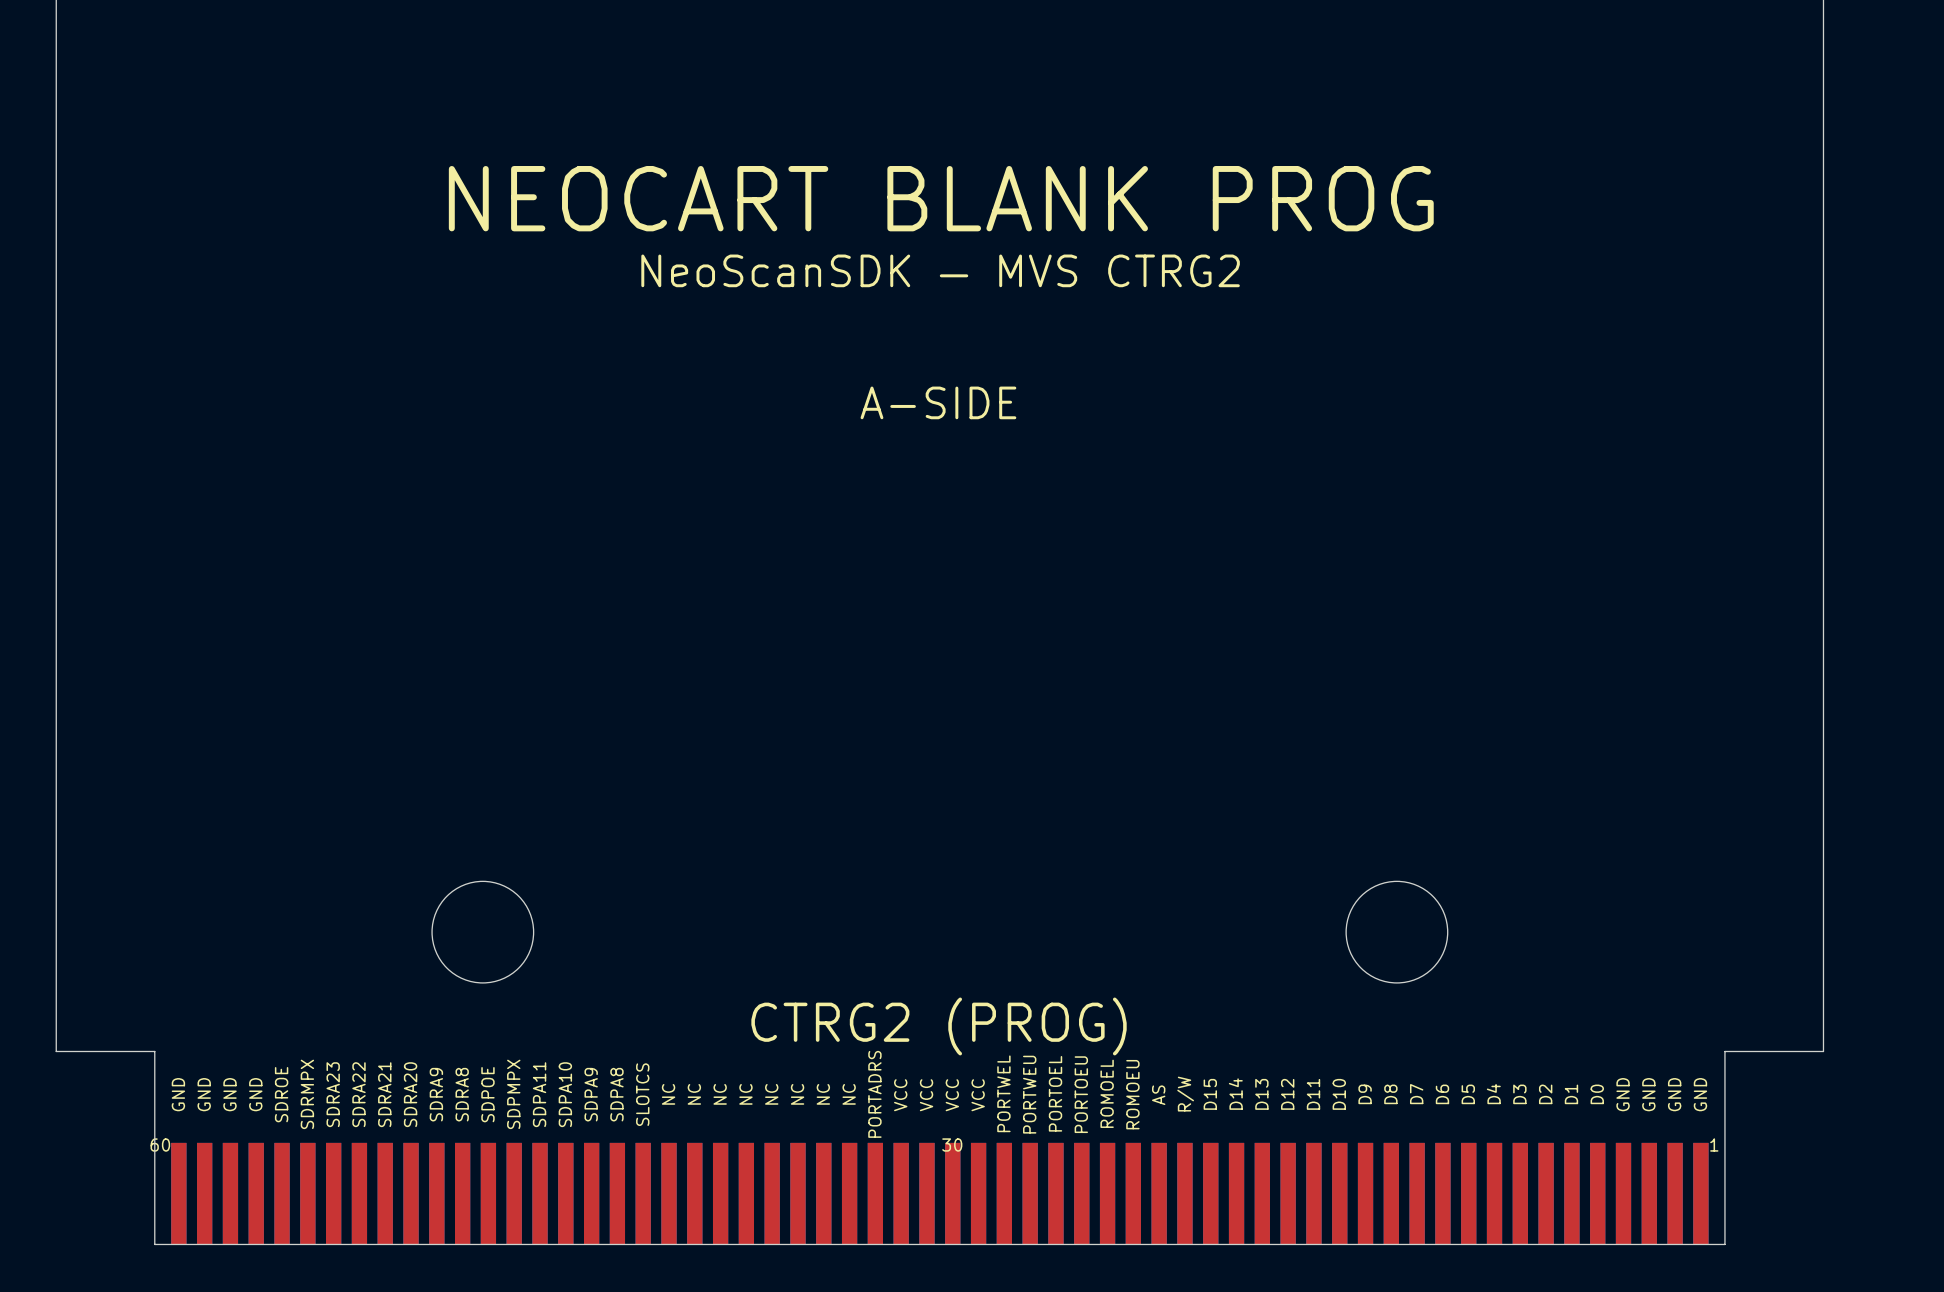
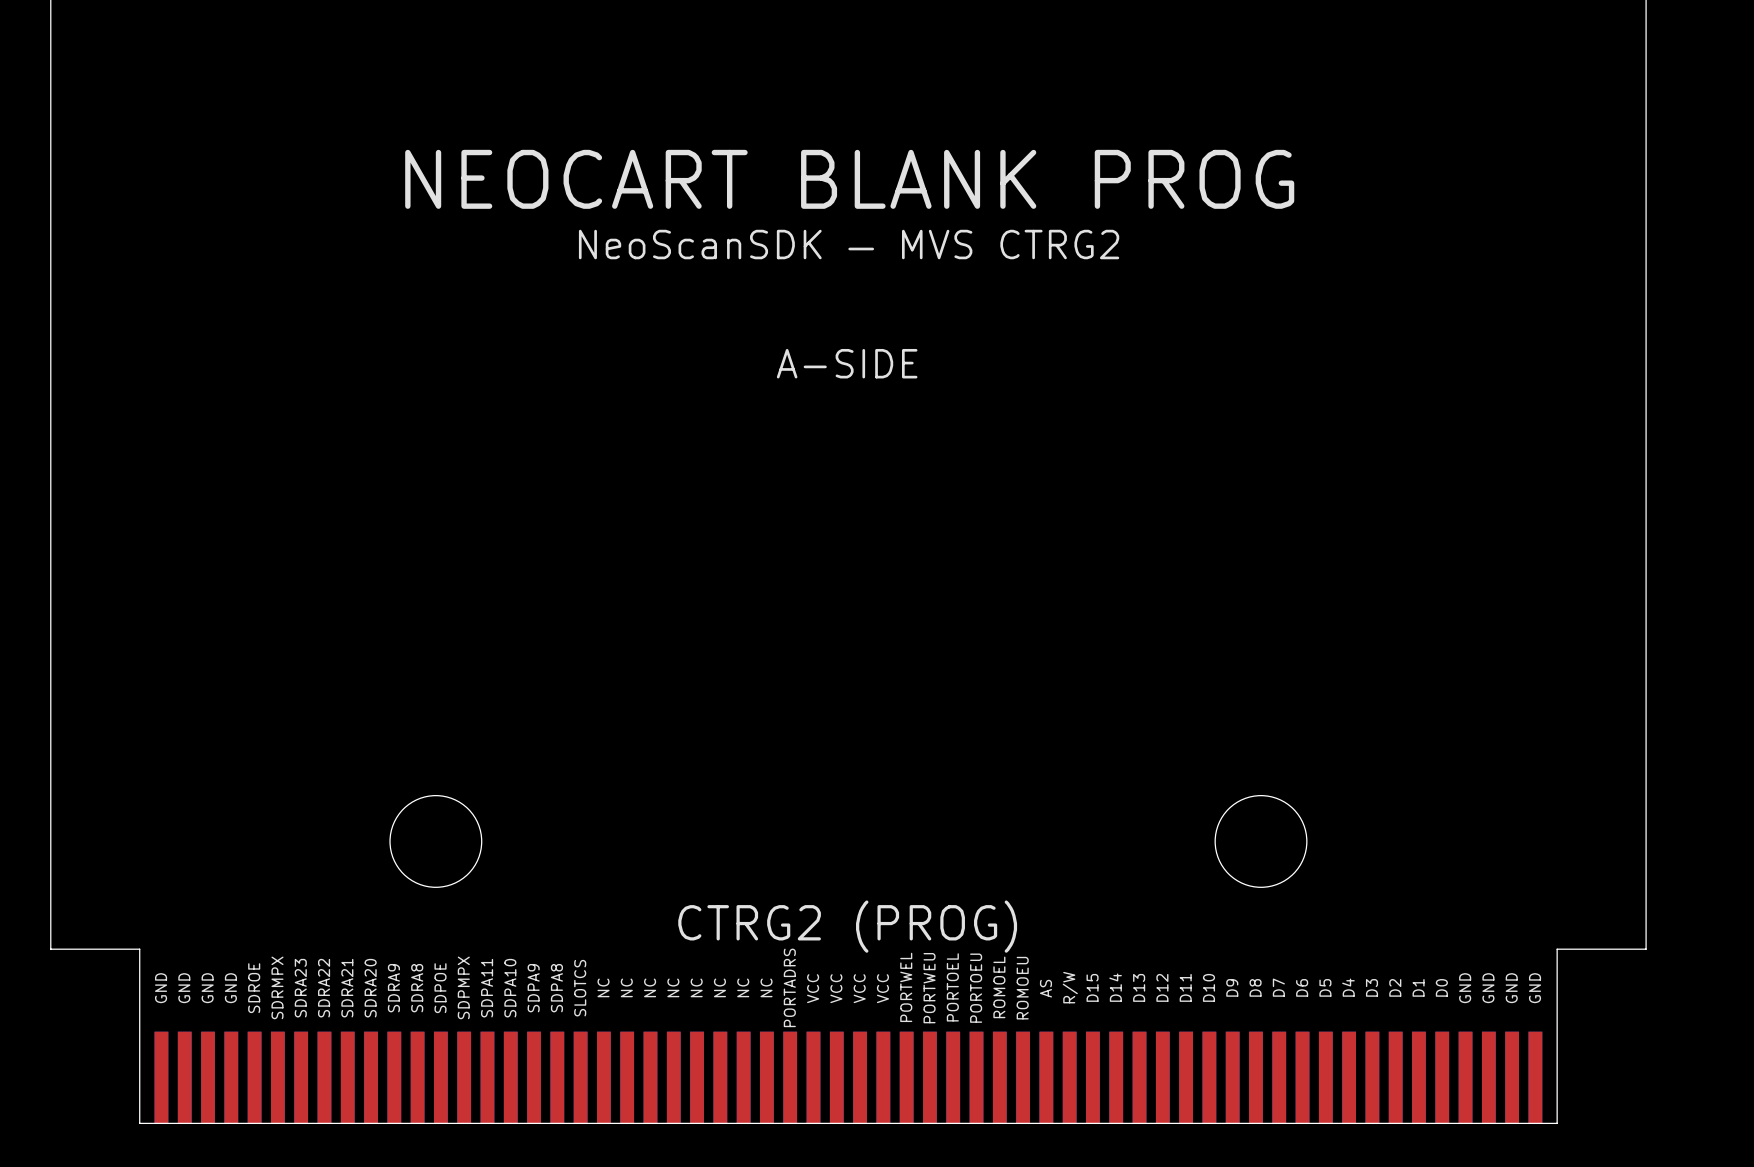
text: 60 (160, 1145) -> none
text: 30 (952, 1145) -> none
text: 1 (1714, 1145) -> none

